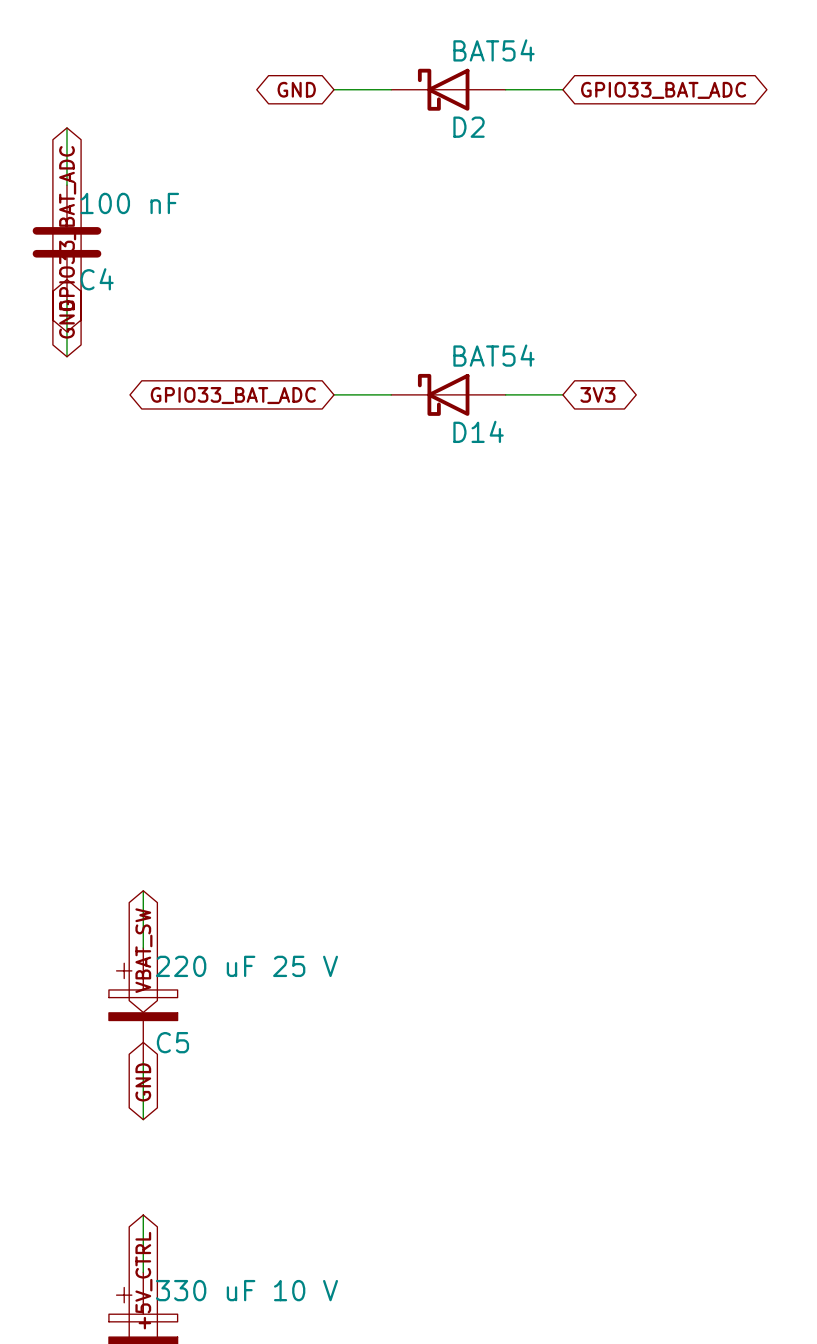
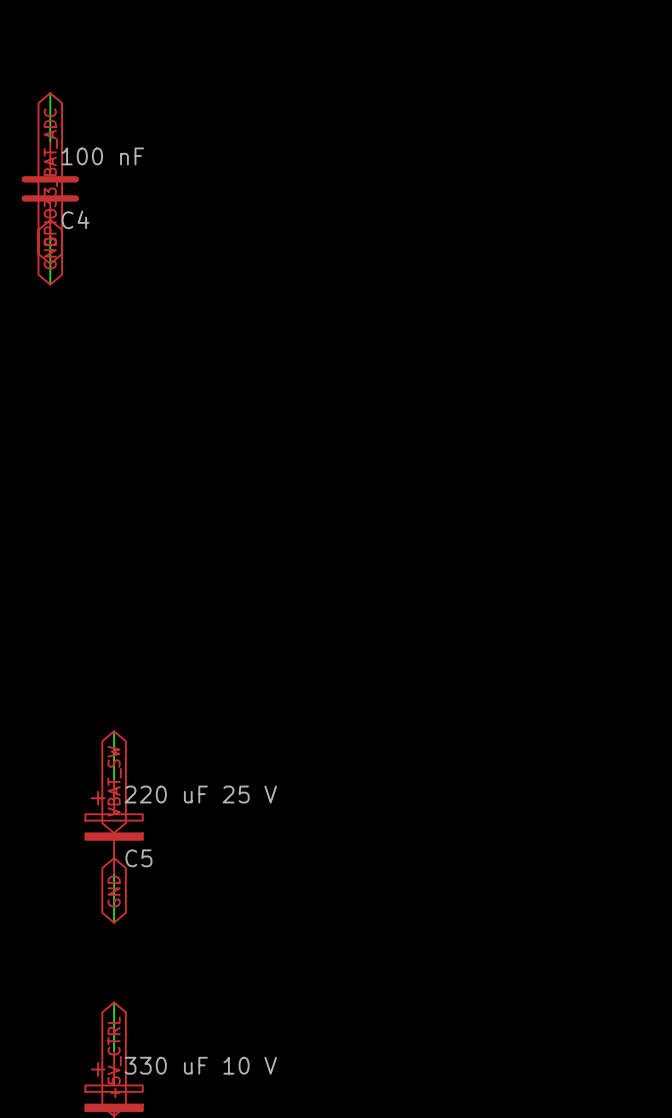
global label: GND (296, 89) -> none
wire: (334, 89) (391, 89) -> none
D2: BAT54 (448, 89) -> none
wire: (505, 89) (562, 89) -> none
global label: GPIO33_BAT_ADC (663, 90) -> none
wire: (334, 394) (391, 394) -> none
D14: BAT54 (448, 394) -> none
wire: (505, 394) (562, 394) -> none
global label: 3V3 (597, 394) -> none
global label: GPIO33_BAT_ADC (233, 395) -> none

